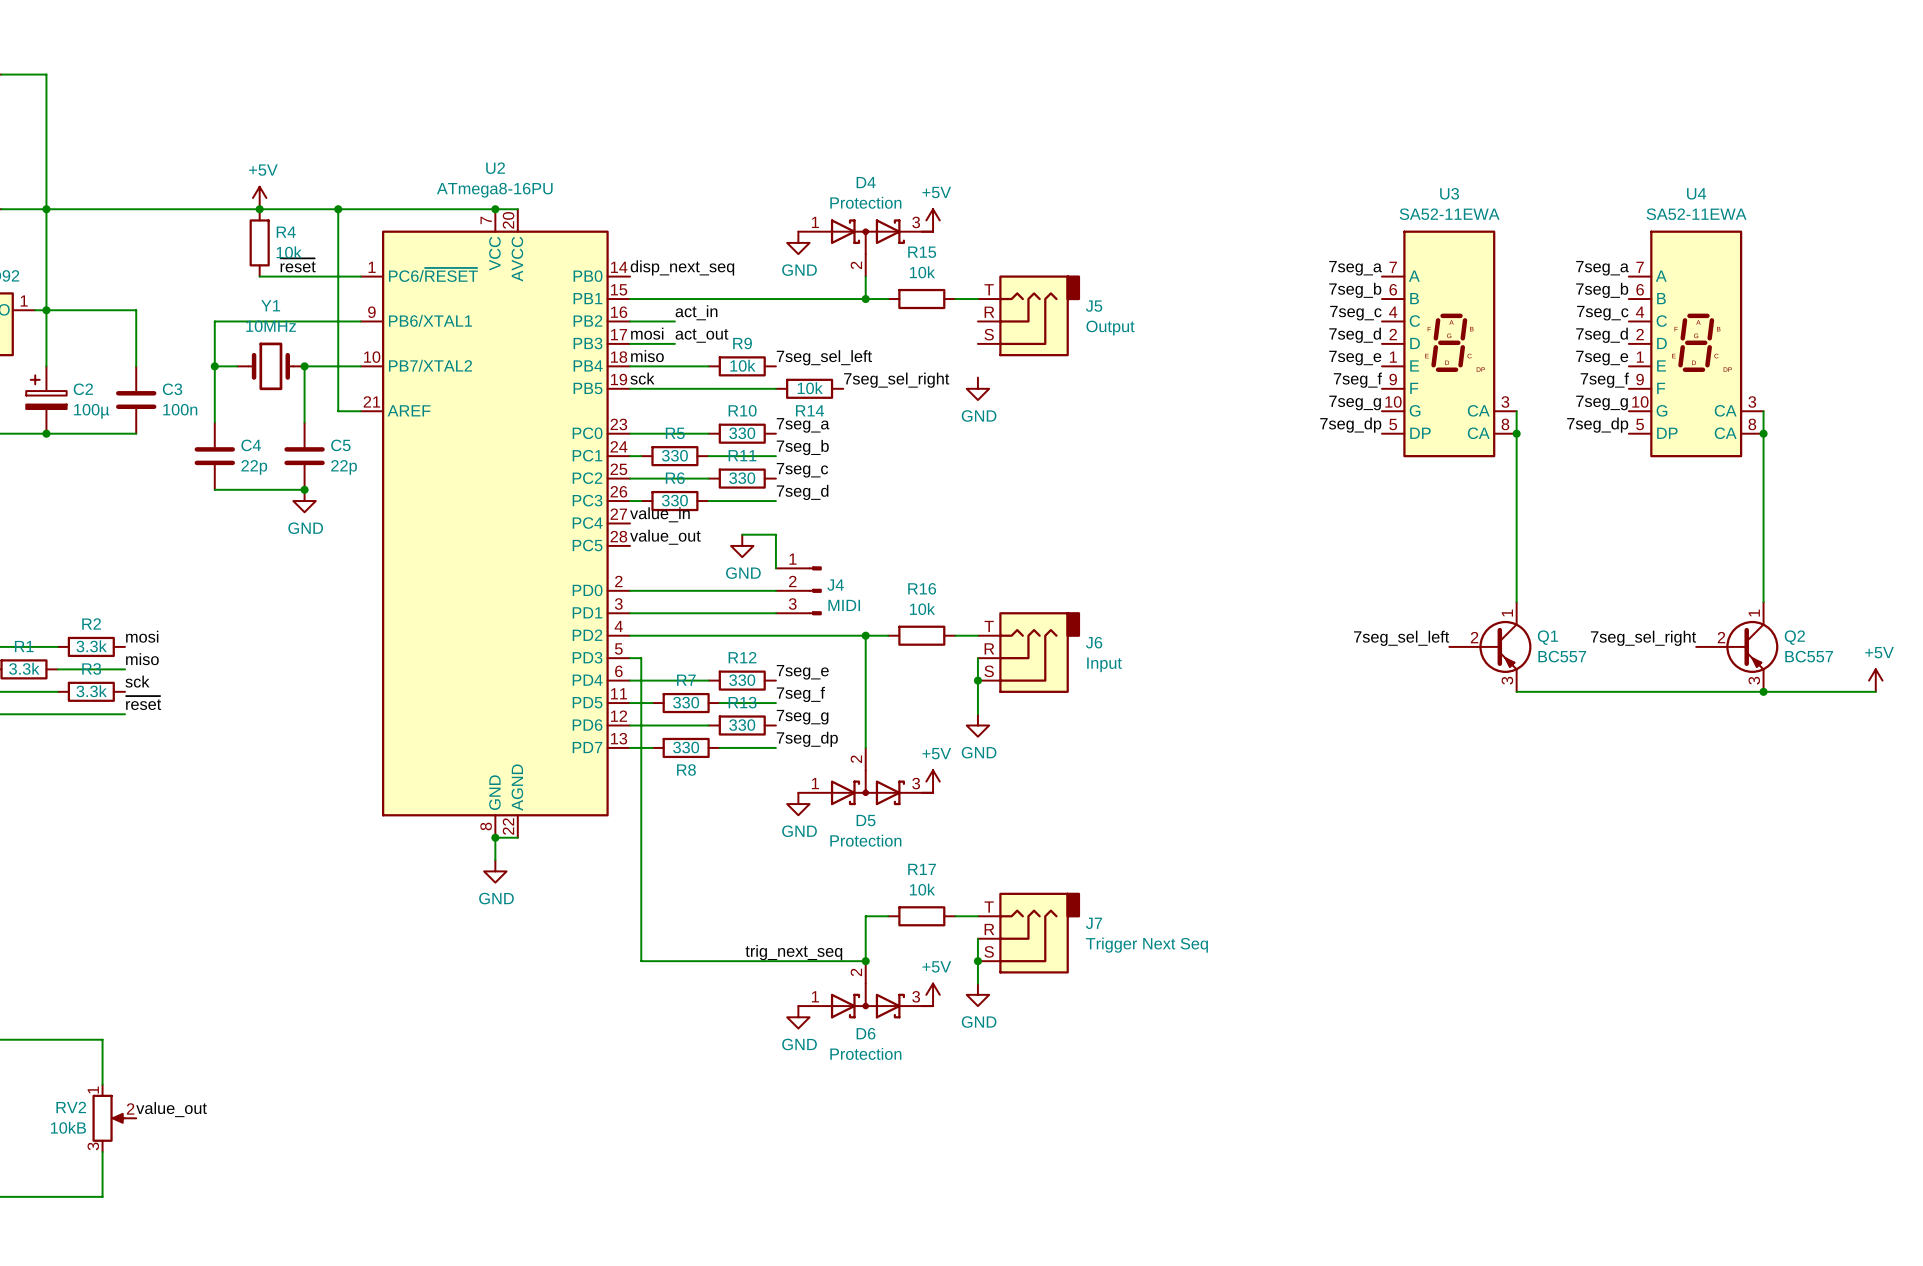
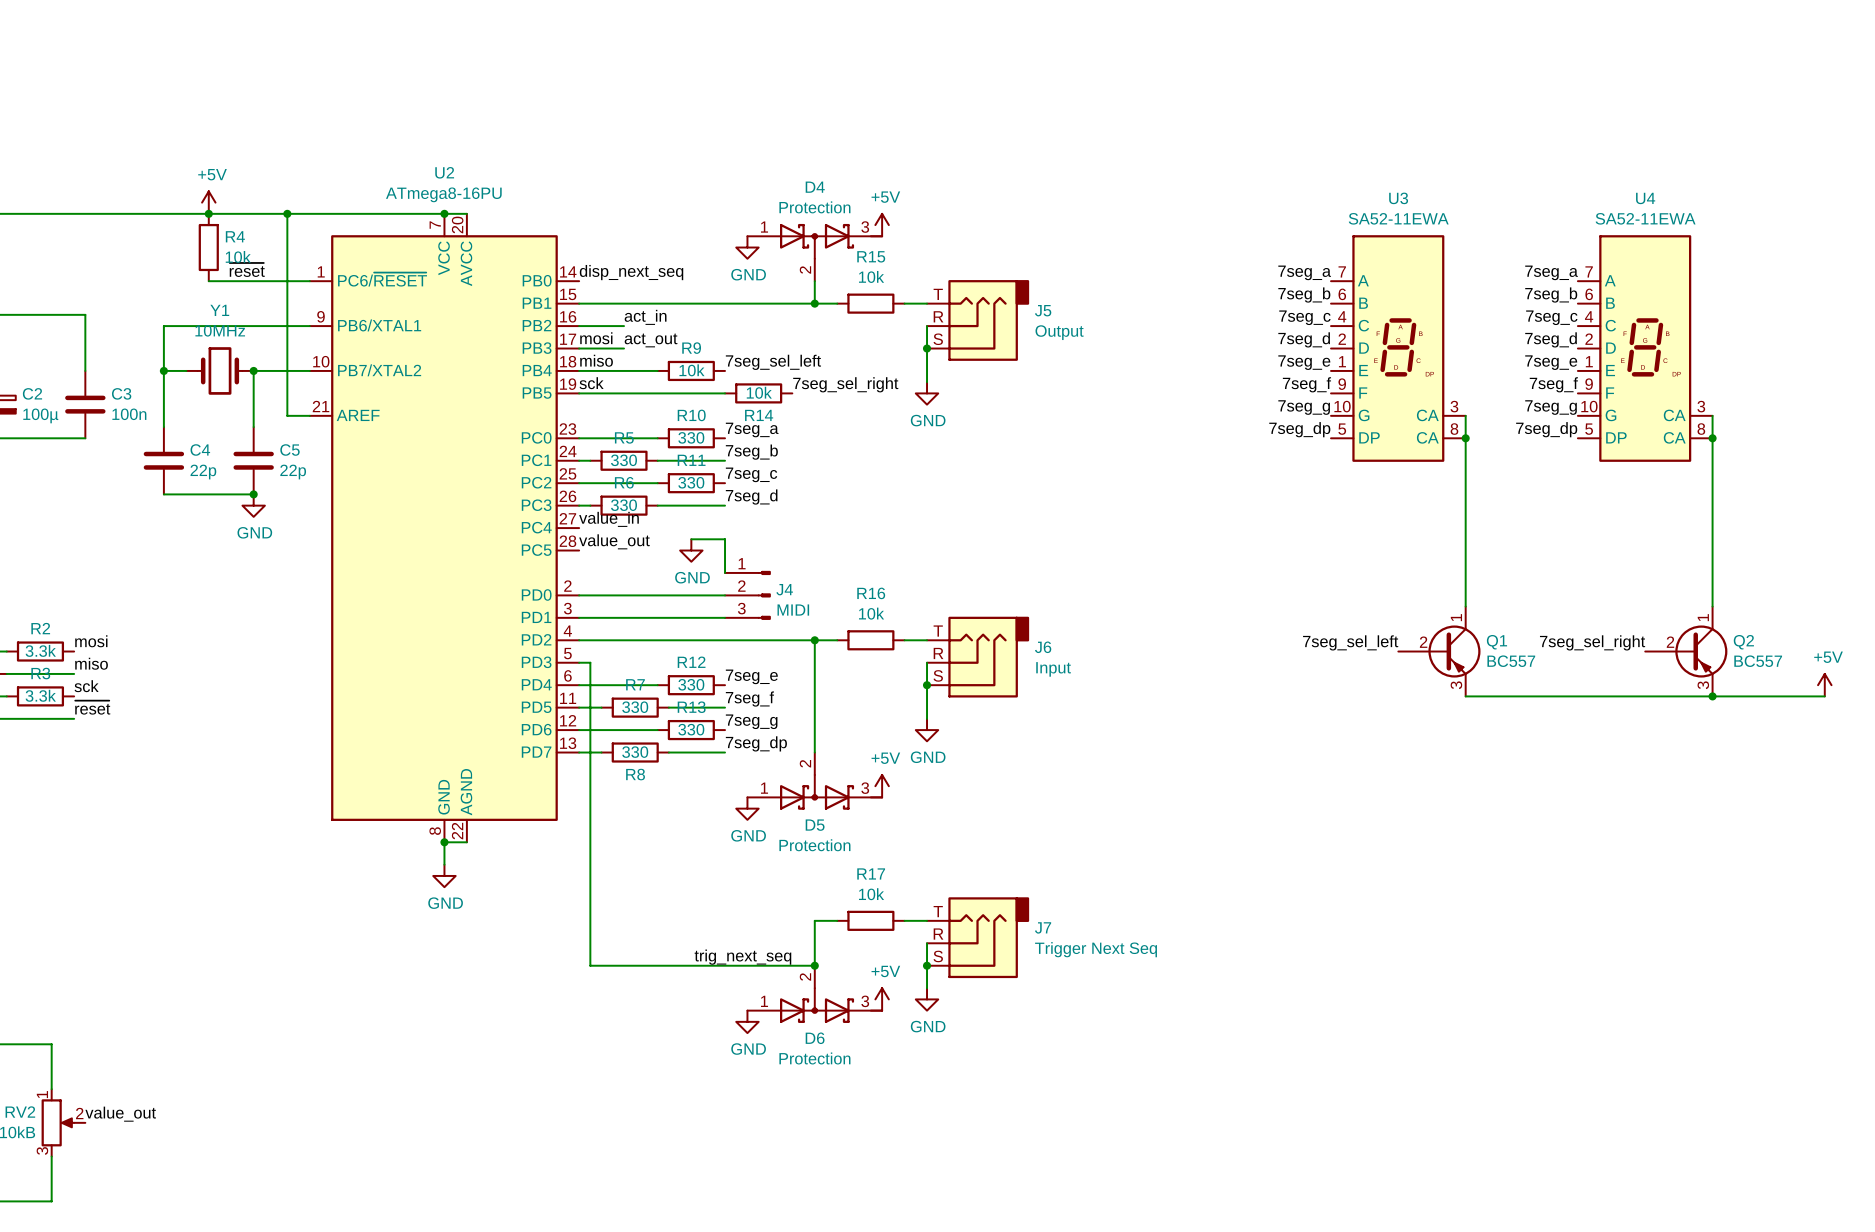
wire: none -> (927, 326) (927, 382)
junction: none -> (927, 348)

